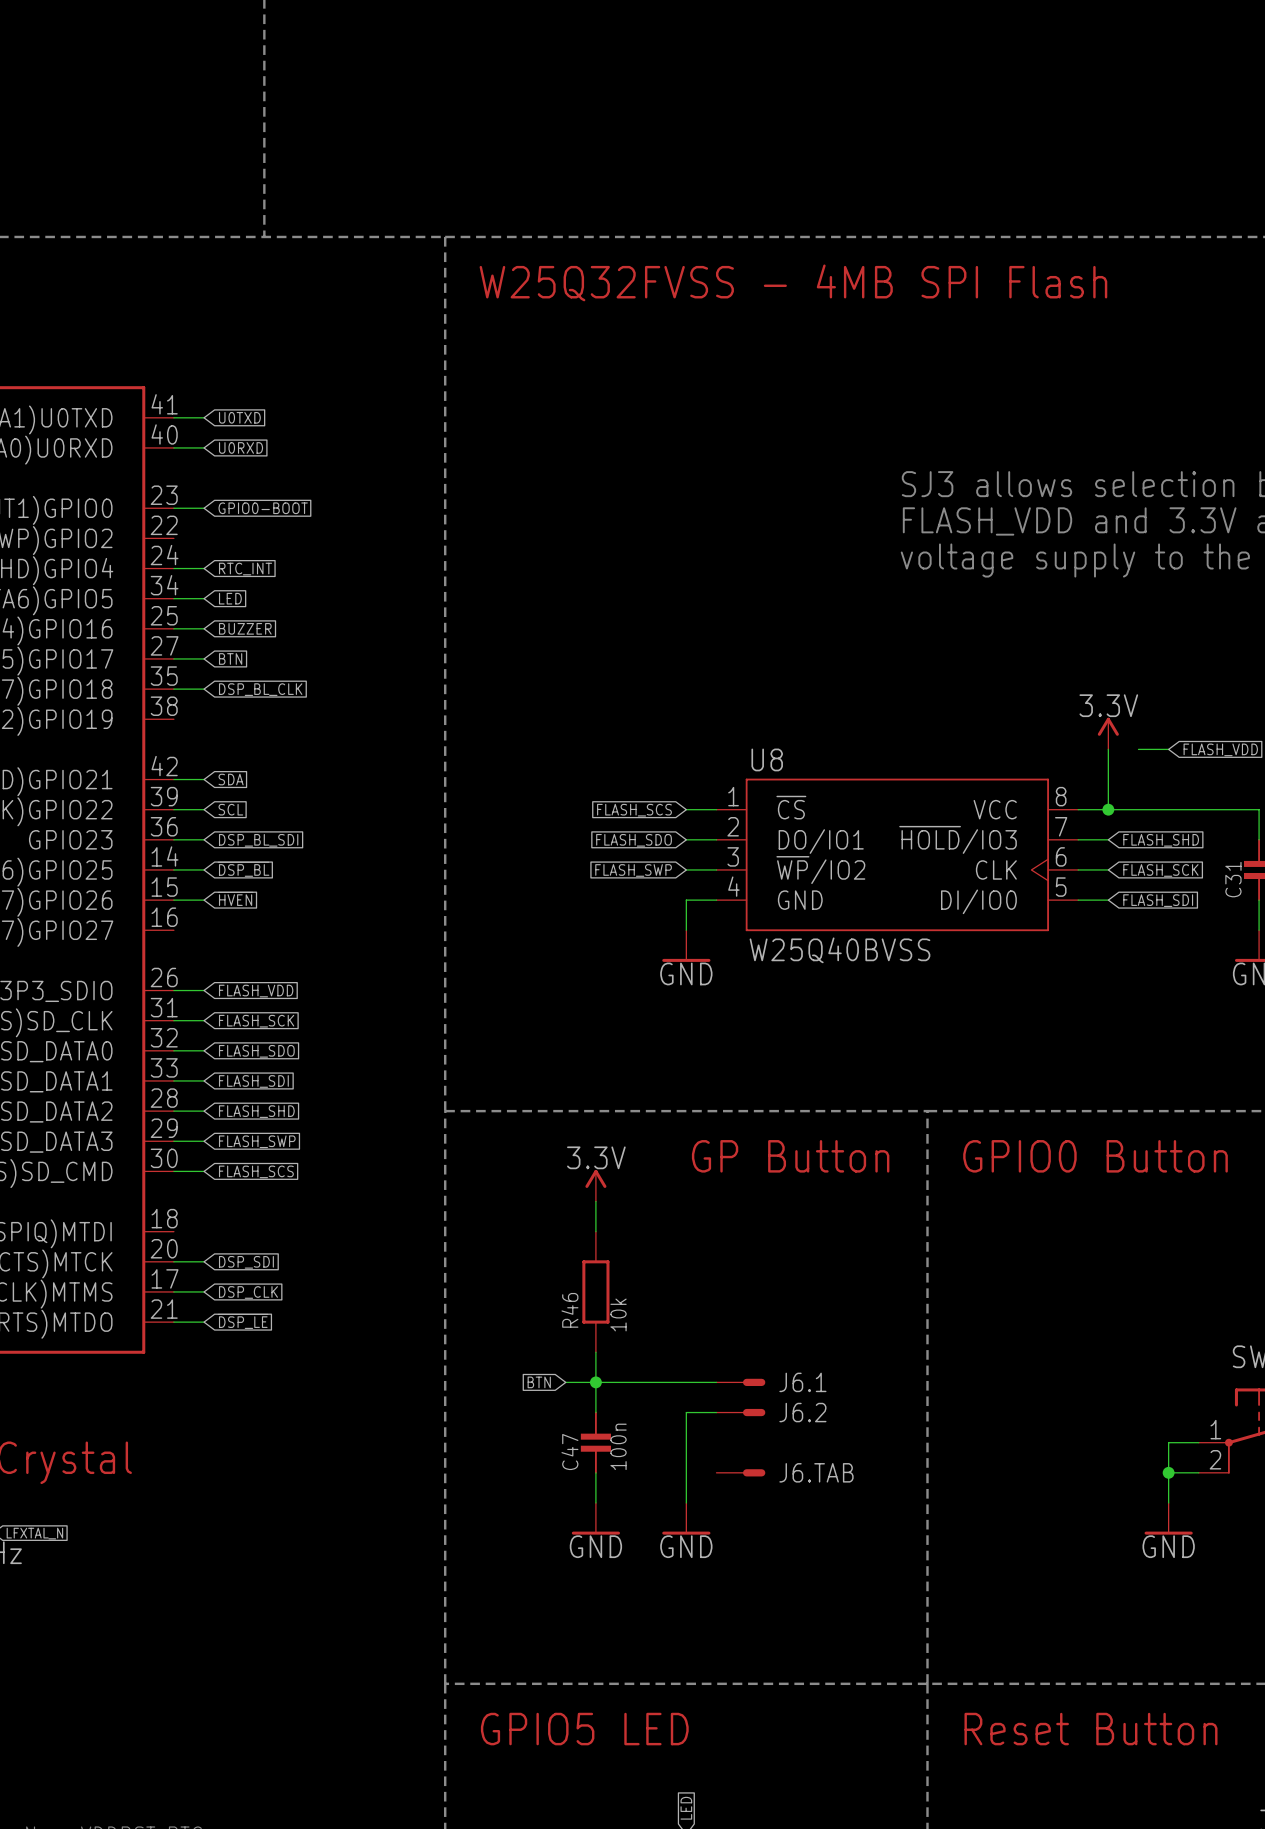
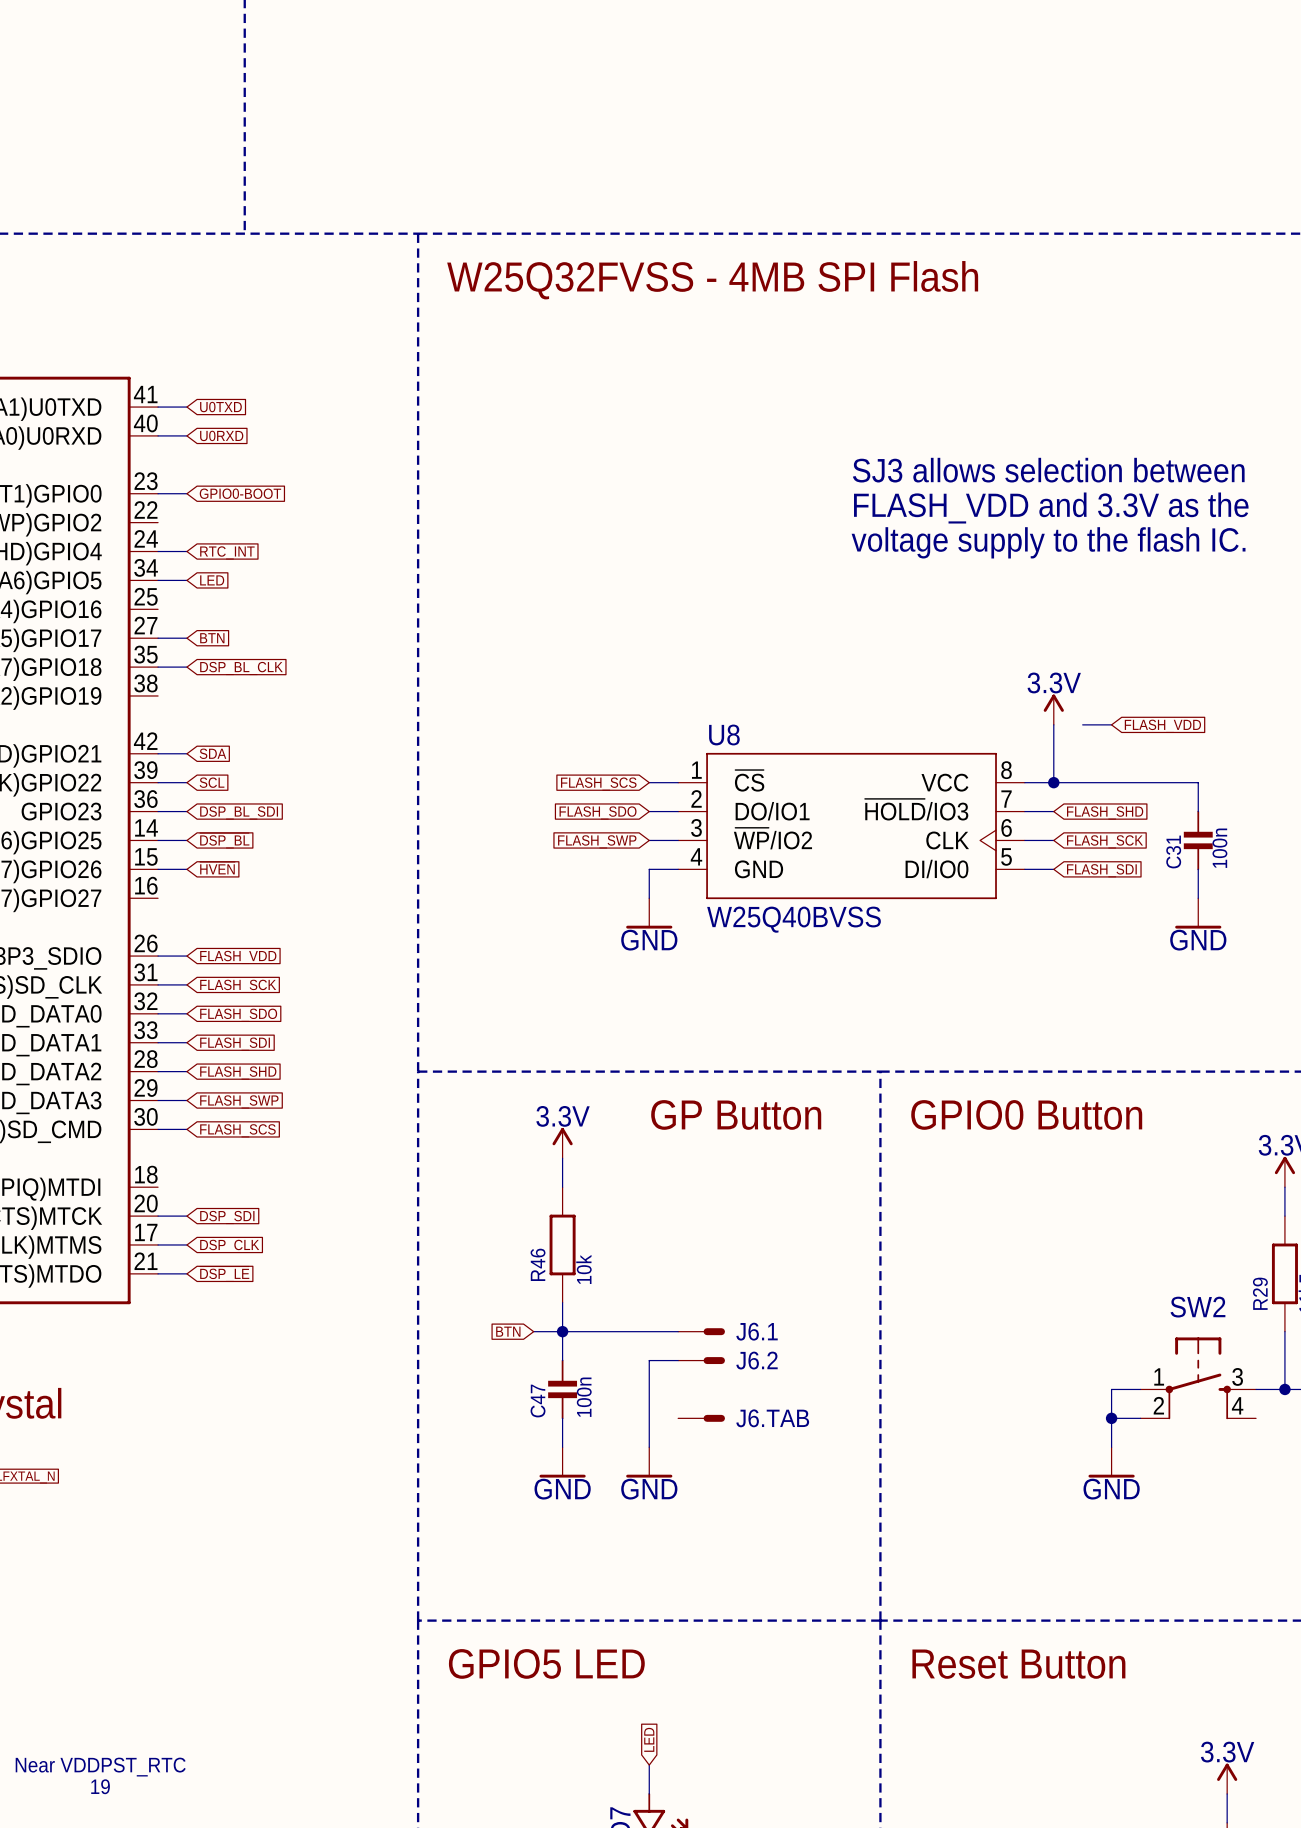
wire: (173, 628) (204, 628) -> none
global label: BUZZER (245, 628) -> none

